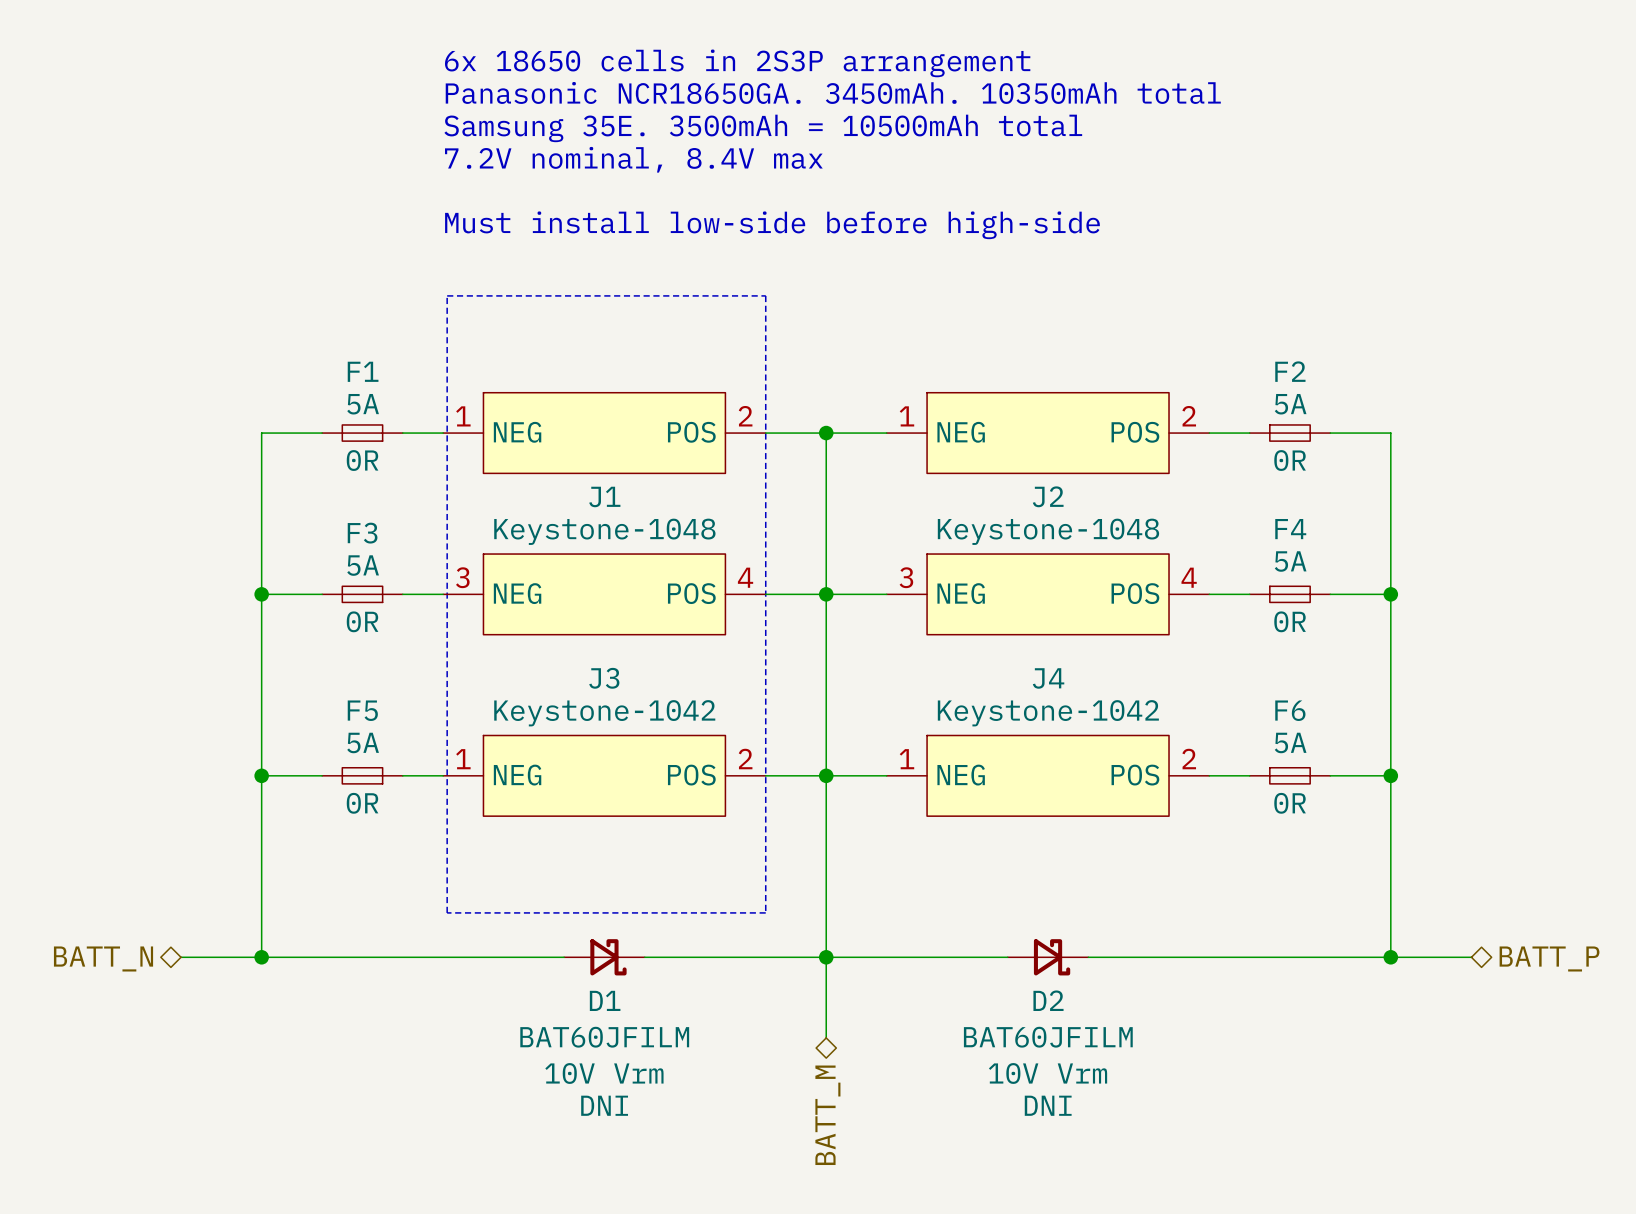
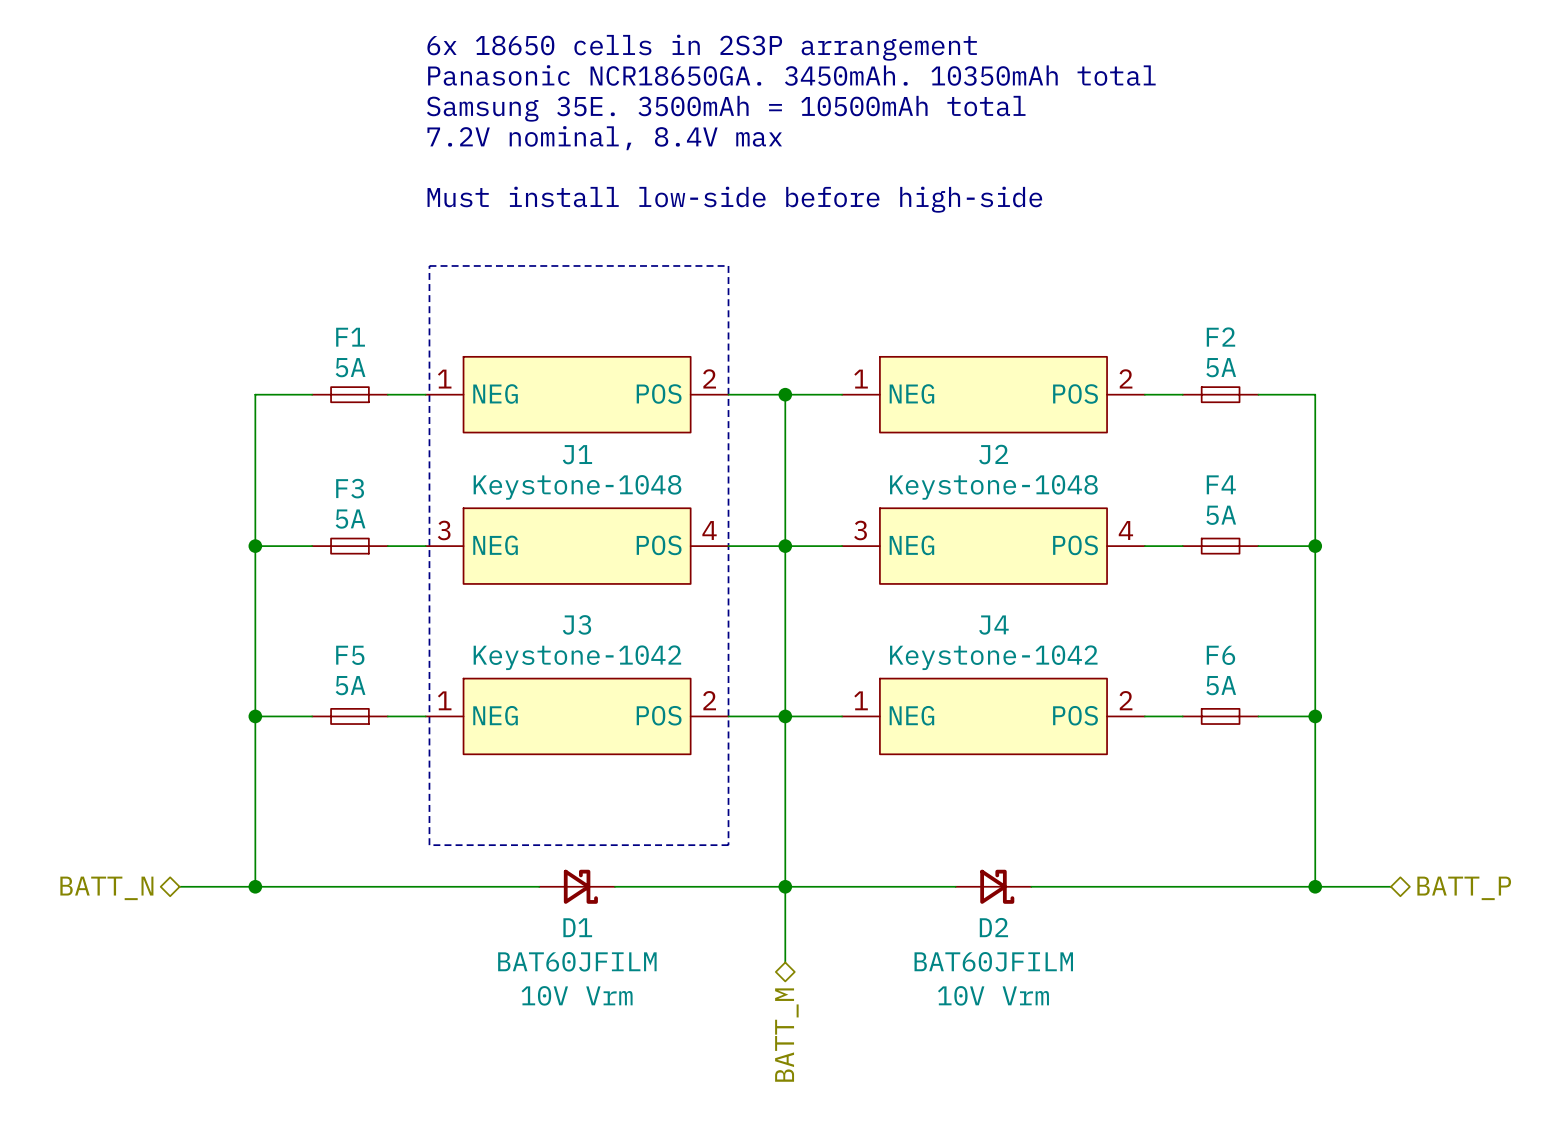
F1 text: 0R (362, 460) -> none
F2 text: 0R (1290, 460) -> none
F3 text: 0R (362, 621) -> none
F4 text: 0R (1290, 621) -> none
F5 text: 0R (362, 803) -> none
F6 text: 0R (1290, 803) -> none
D1 text: DNI (604, 1105) -> none
D2 text: DNI (1048, 1105) -> none

